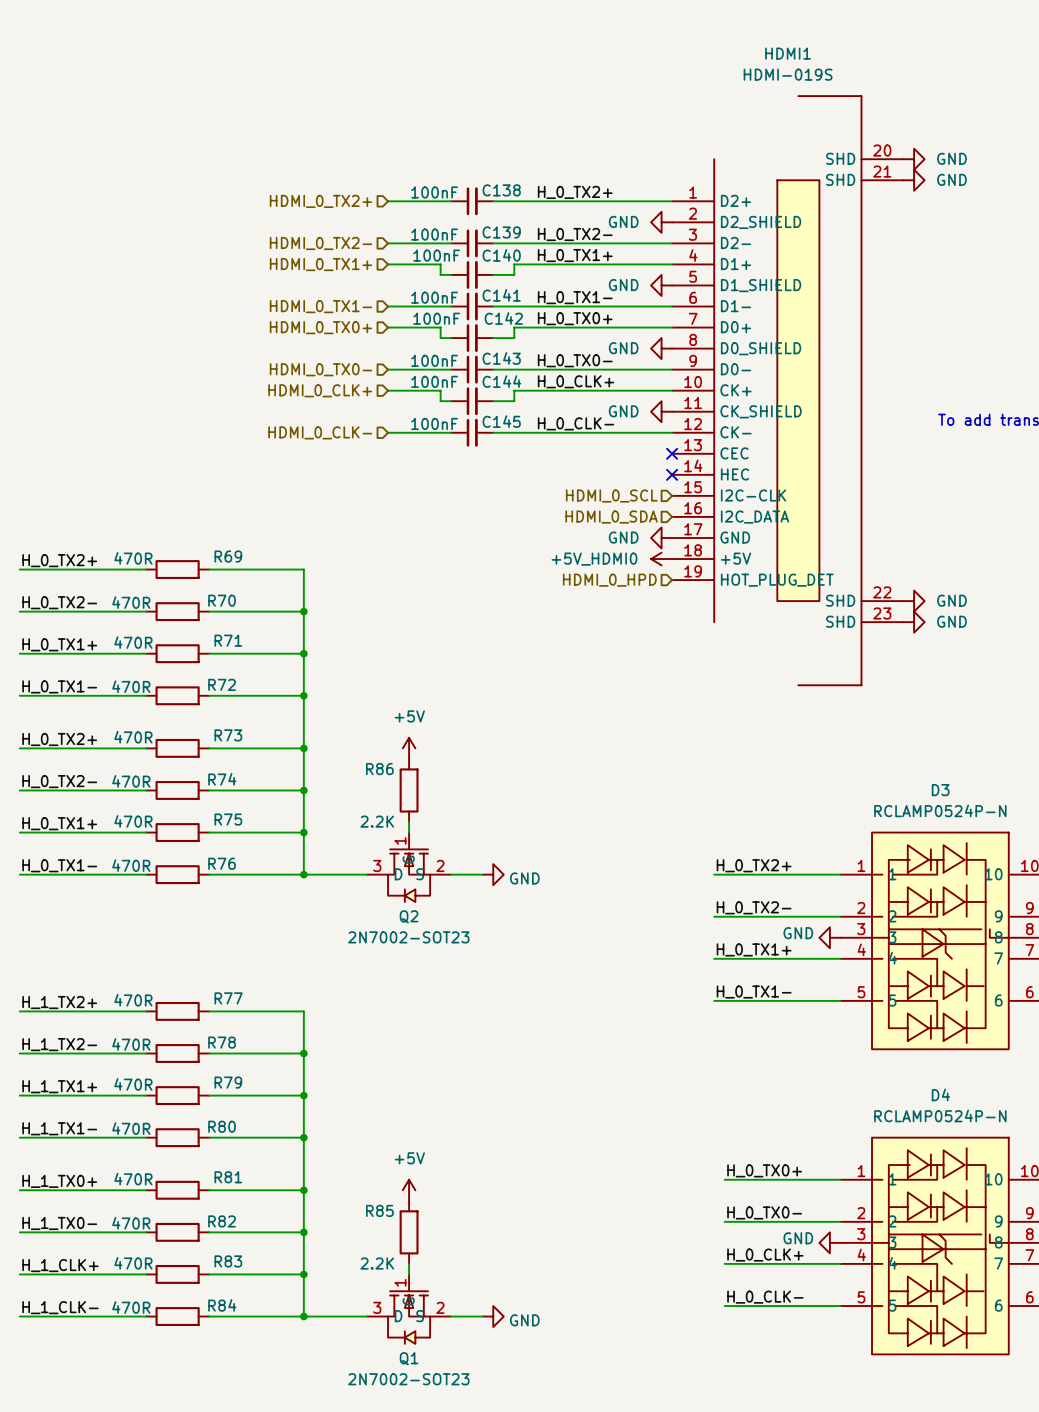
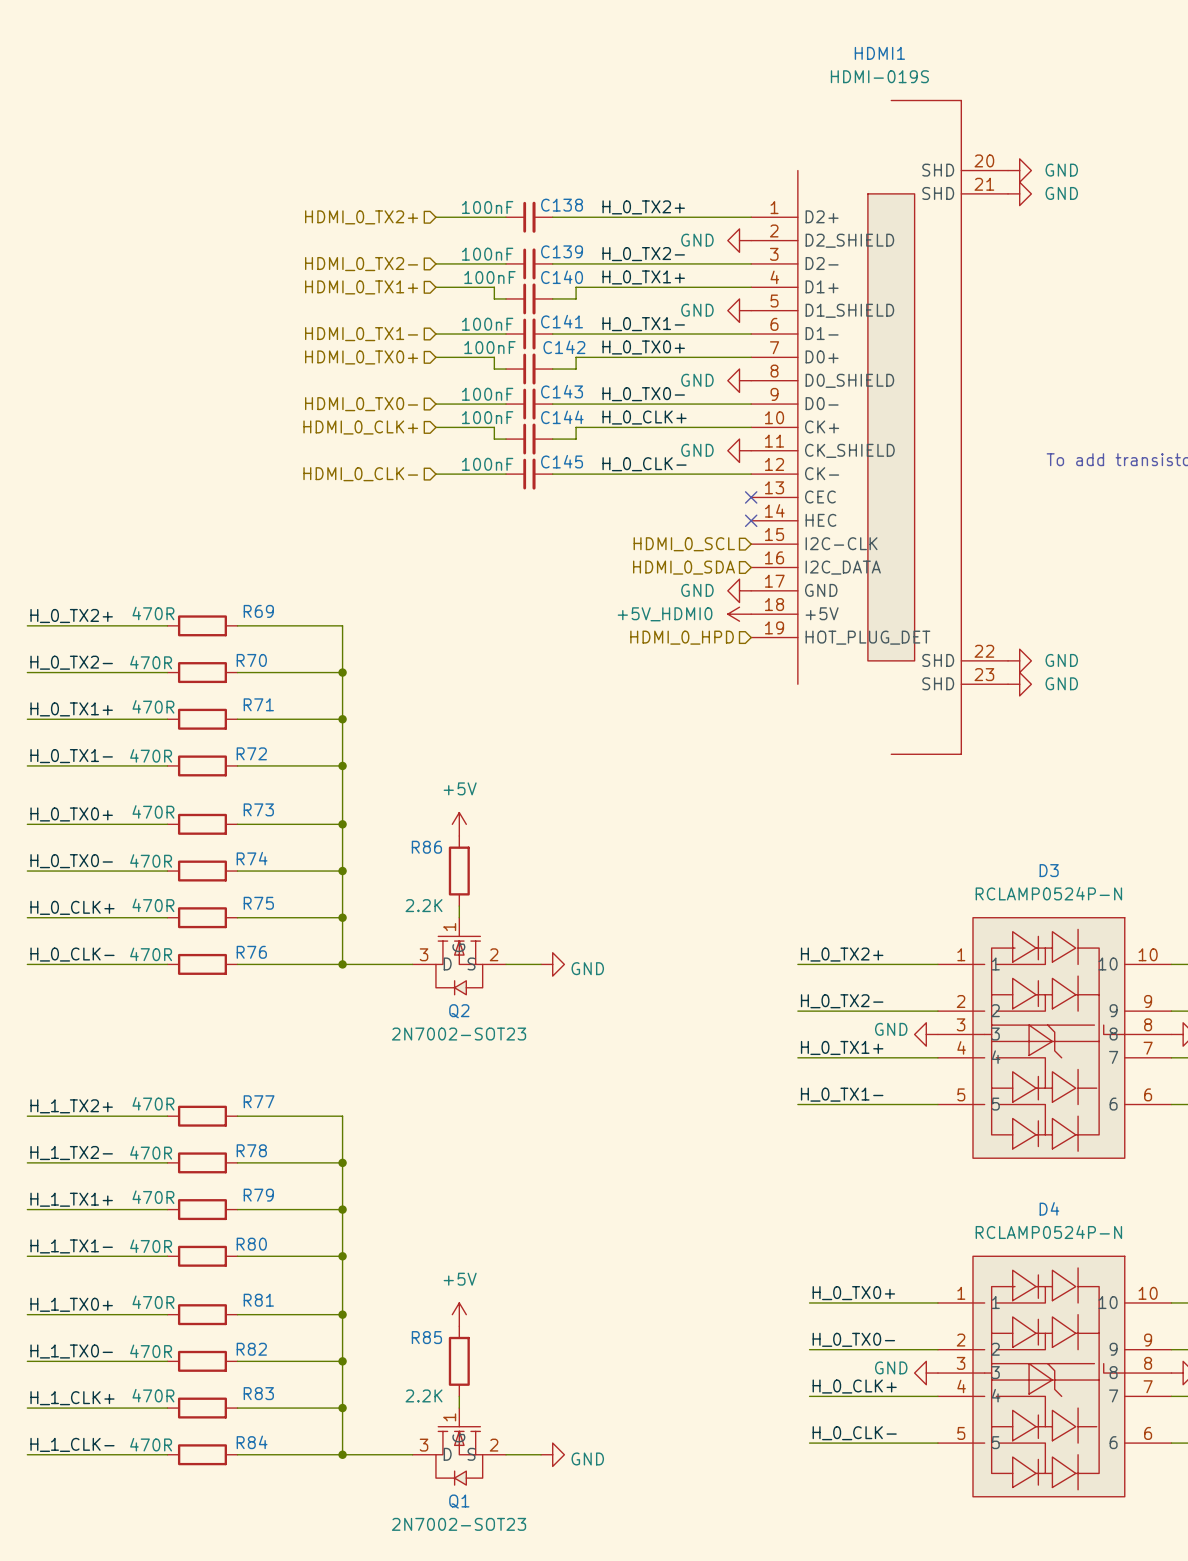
label: H_0_TX2+ (59, 739) -> H_0_TX0+ (71, 814)
label: H_0_TX2- (59, 781) -> H_0_TX0- (71, 861)
label: H_0_TX1+ (59, 823) -> H_0_CLK+ (72, 907)
label: H_0_TX1- (59, 865) -> H_0_CLK- (72, 954)

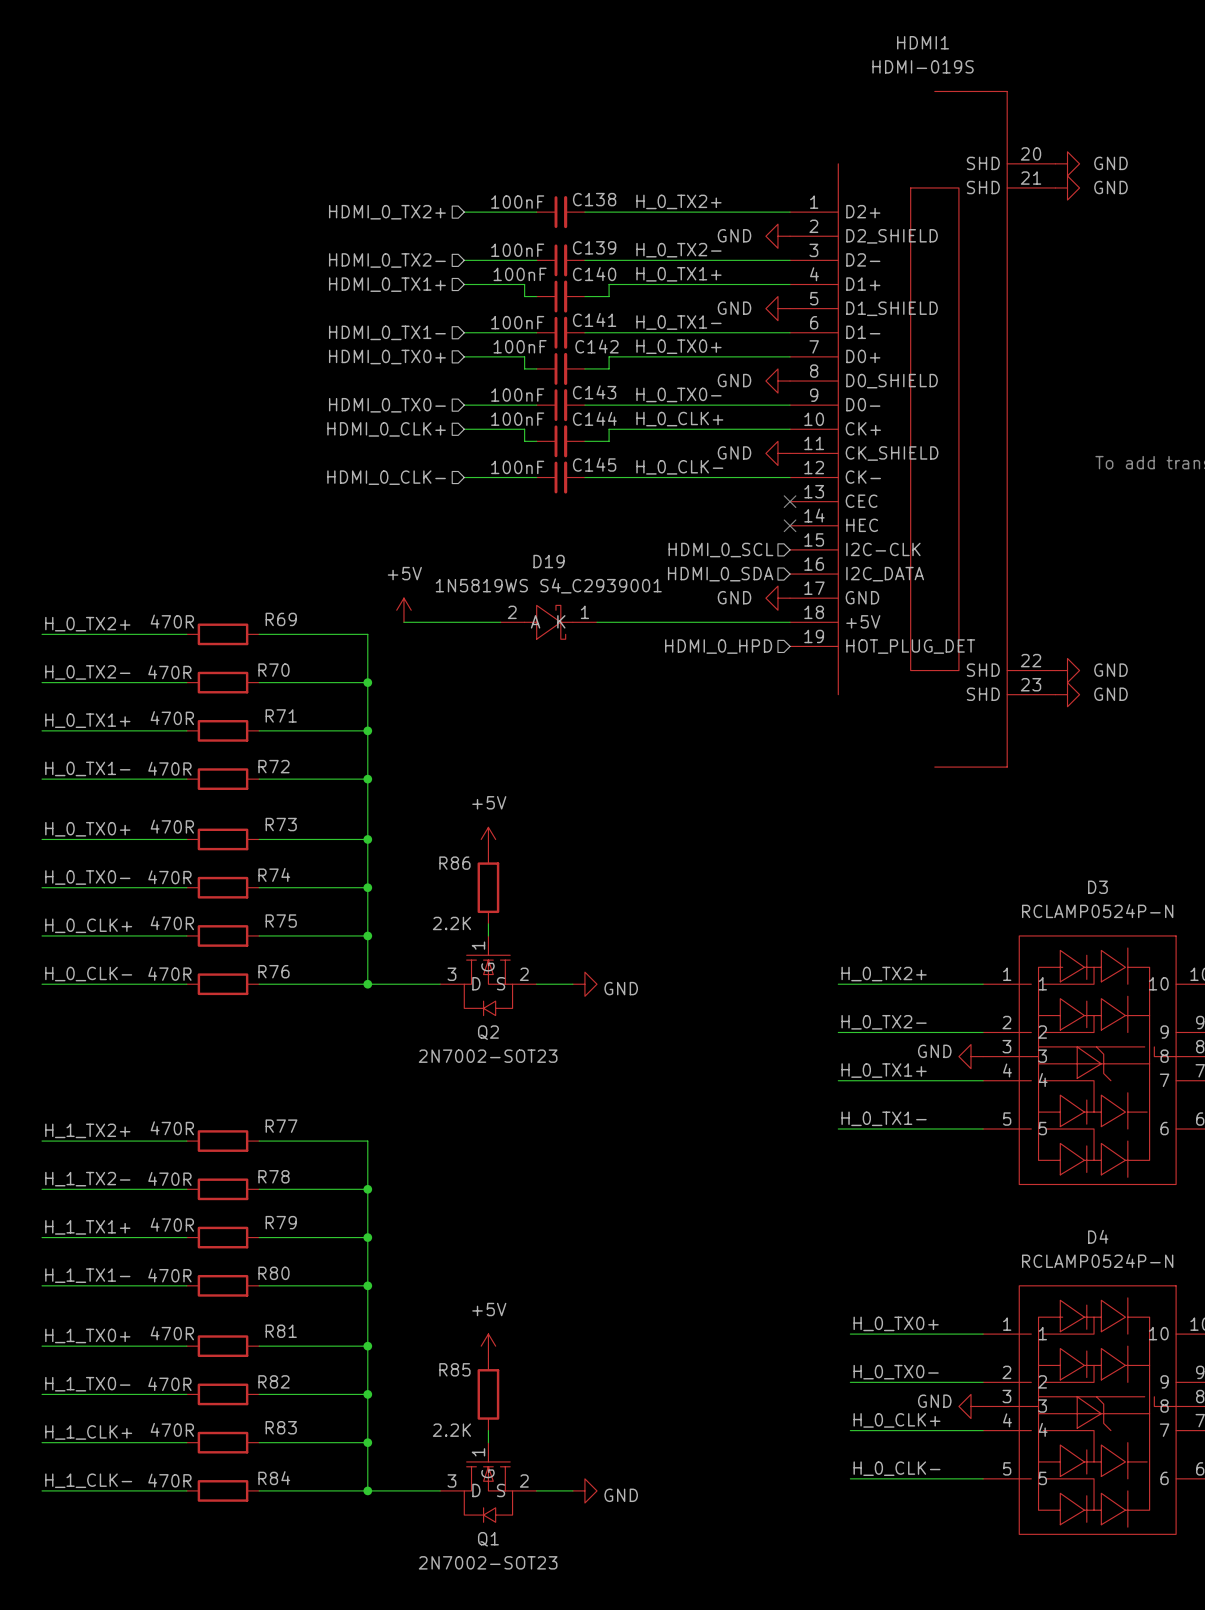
power symbol: none -> +5V (403, 610)
wire: none -> (403, 622) (500, 622)
D19: none -> 1N5819WS S4_C2939001 (548, 622)
wire: none -> (597, 622) (790, 622)
power symbol: +5V_HDMI0 (739, 614) -> none

